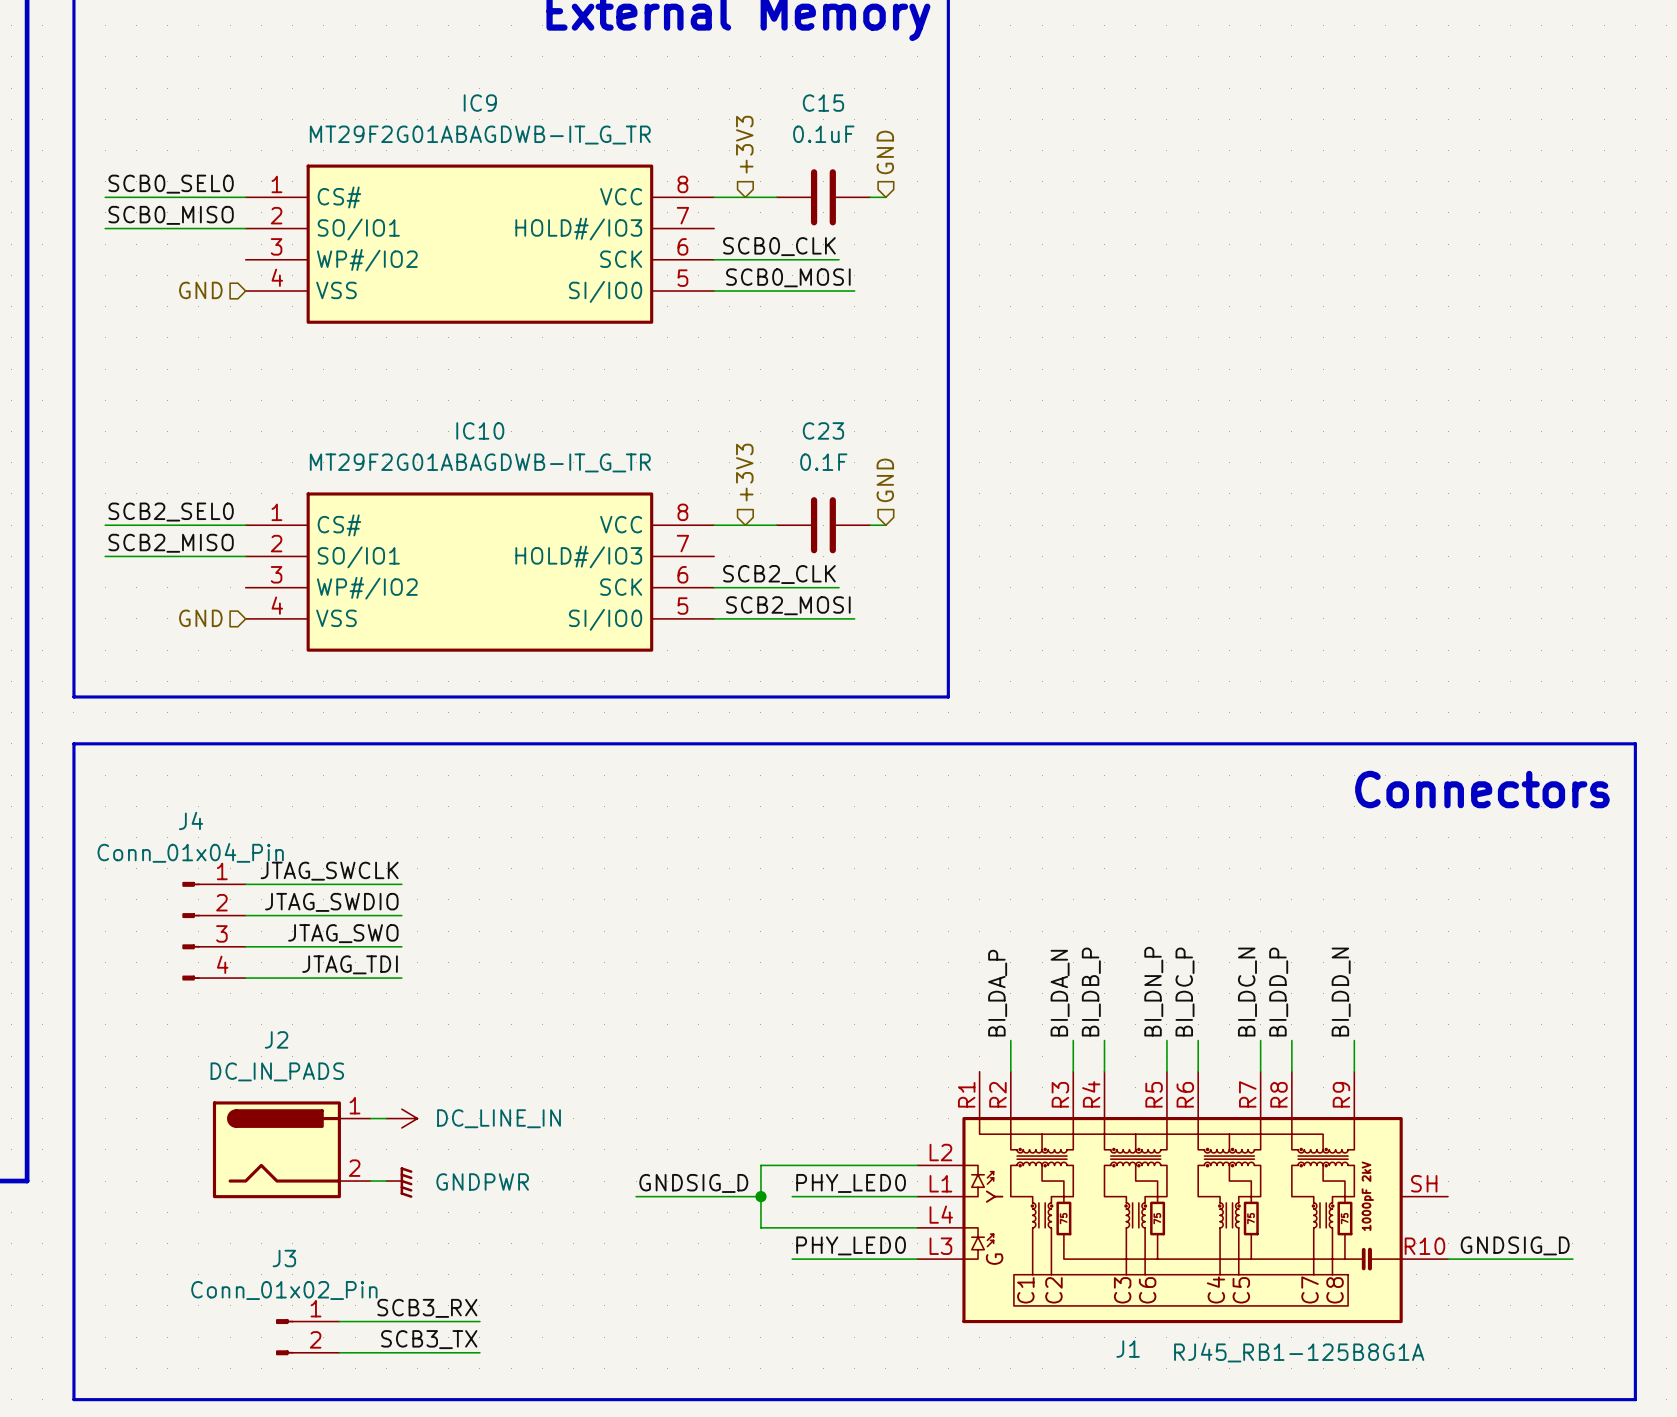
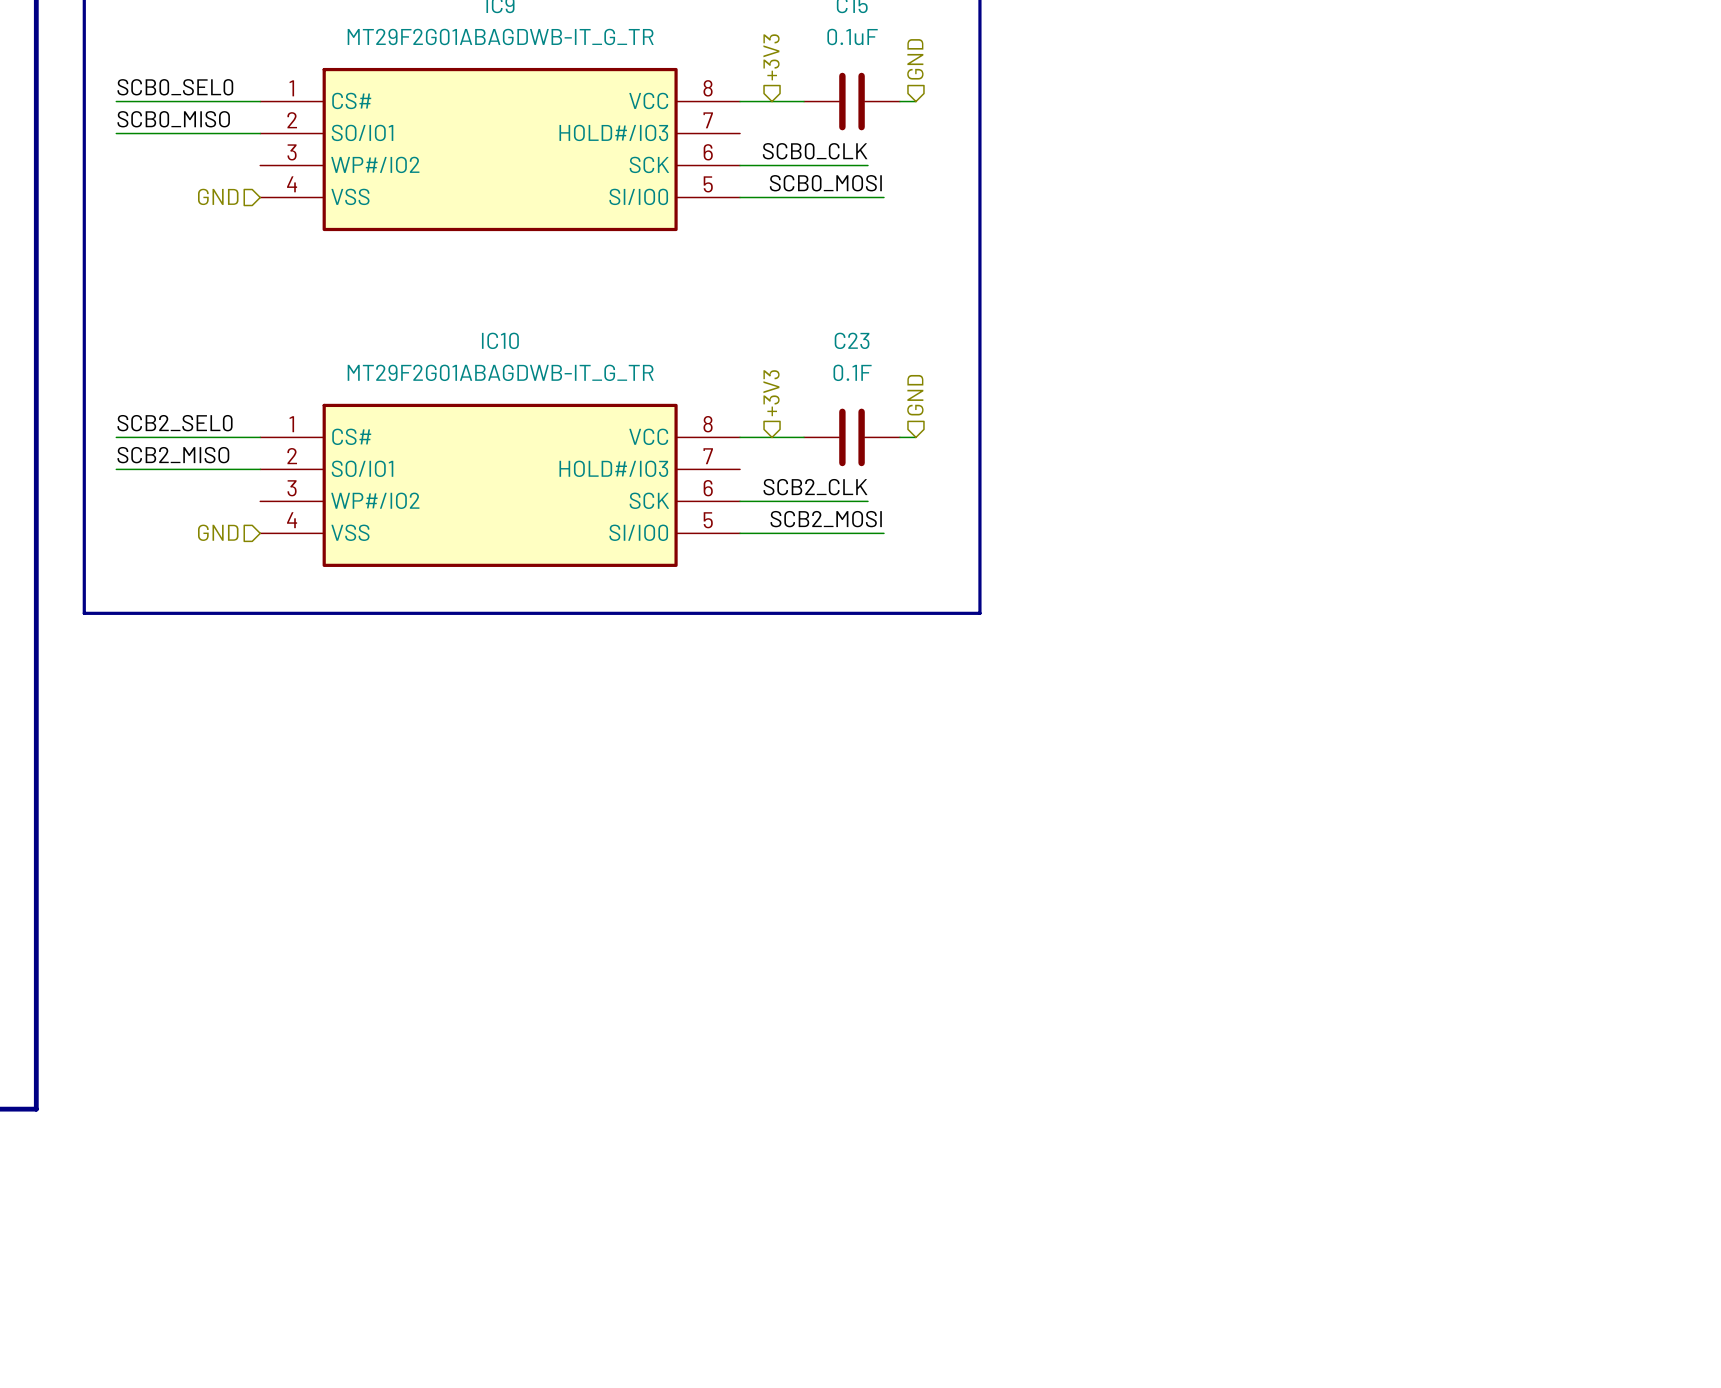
line: (73, 743) (1635, 743) (1635, 1399) (73, 1399) (73, 743) -> none
text: Connectors (1482, 789) -> none
label: JTAG_SWCLK (329, 871) -> none
wire: (245, 884) (401, 884) -> none
label: JTAG_SWDIO (331, 902) -> none
wire: (245, 915) (401, 915) -> none
J4: Conn_01x04_Pin (214, 931) -> none
label: JTAG_SWO (343, 933) -> none
wire: (245, 946) (401, 946) -> none
label: JTAG_TDI (350, 964) -> none
wire: (245, 978) (401, 978) -> none
label: BI_DN_P (1153, 991) -> none
label: BI_DB_P (1091, 992) -> none
label: BI_DC_P (1184, 992) -> none
label: BI_DC_N (1247, 992) -> none
label: BI_DD_P (1278, 992) -> none
label: BI_DD_N (1341, 992) -> none
label: BI_DA_P (997, 993) -> none
label: BI_DA_N (1060, 993) -> none
wire: (1010, 1040) (1010, 1071) -> none
wire: (1073, 1040) (1073, 1071) -> none
wire: (1104, 1040) (1104, 1071) -> none
wire: (1166, 1040) (1166, 1071) -> none
wire: (1198, 1040) (1198, 1071) -> none
wire: (1260, 1040) (1260, 1071) -> none
wire: (1291, 1040) (1291, 1071) -> none
wire: (1354, 1040) (1354, 1071) -> none
wire: (370, 1118) (386, 1118) -> none
power symbol: DC_LINE_IN (401, 1118) -> none
J2: DC_IN_PADS (291, 1149) -> none
wire: (917, 1165) (760, 1165) (760, 1227) (917, 1227) -> none
wire: (370, 1181) (386, 1181) -> none
power symbol: GNDPWR (399, 1182) -> none
label: GNDSIG_D (693, 1183) -> none
label: PHY_LED0 (851, 1183) -> none
wire: (636, 1196) (760, 1196) -> none
junction: (760, 1196) -> none
wire: (792, 1196) (917, 1196) -> none
J1: RJ45_RB1-125B8G1A (1182, 1197) -> none
label: PHY_LED0 (851, 1245) -> none
label: GNDSIG_D (1515, 1245) -> none
wire: (792, 1259) (917, 1259) -> none
wire: (1448, 1259) (1572, 1259) -> none
label: SCB3_RX (427, 1308) -> none
wire: (339, 1321) (479, 1321) -> none
J3: Conn_01x02_Pin (307, 1337) -> none
label: SCB3_TX (429, 1339) -> none
wire: (339, 1352) (479, 1352) -> none

